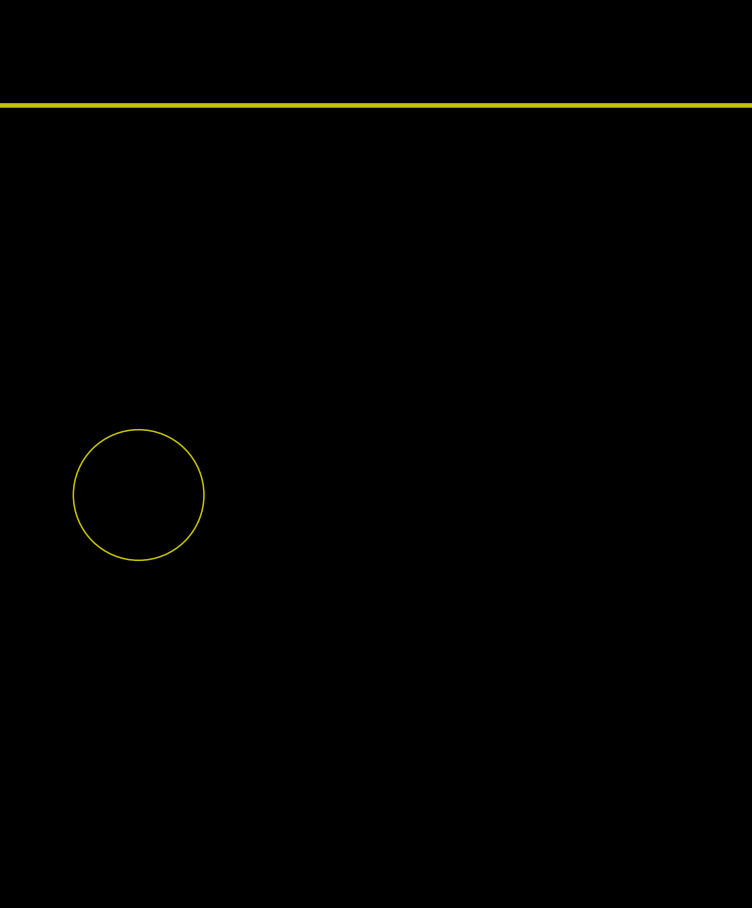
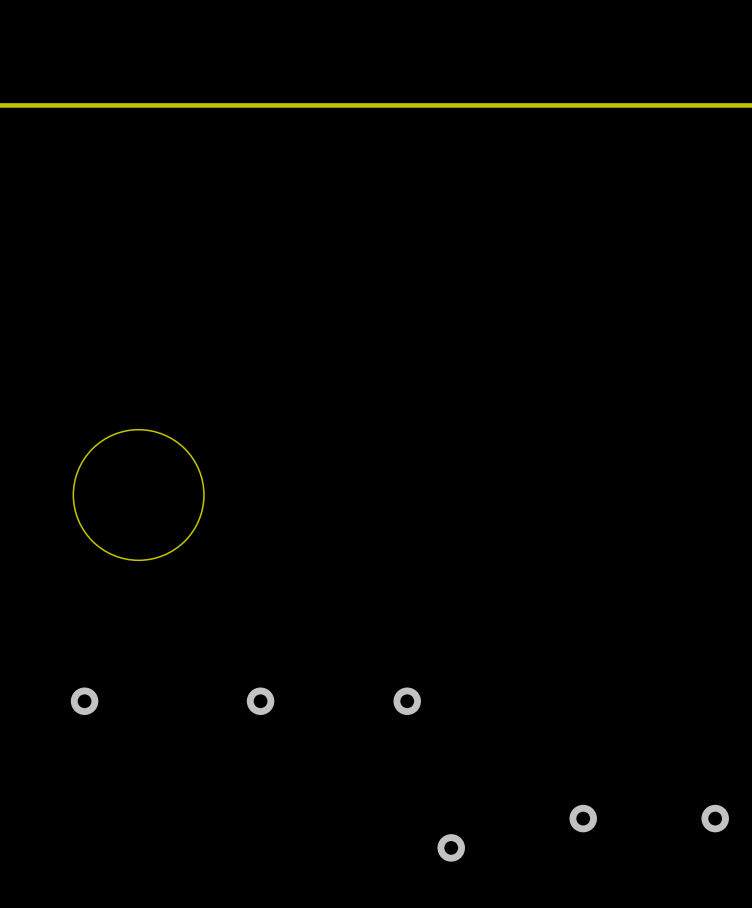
via: none -> (84, 701)
via: none -> (260, 701)
via: none -> (407, 701)
via: none -> (583, 818)
via: none -> (715, 818)
via: none -> (451, 847)

